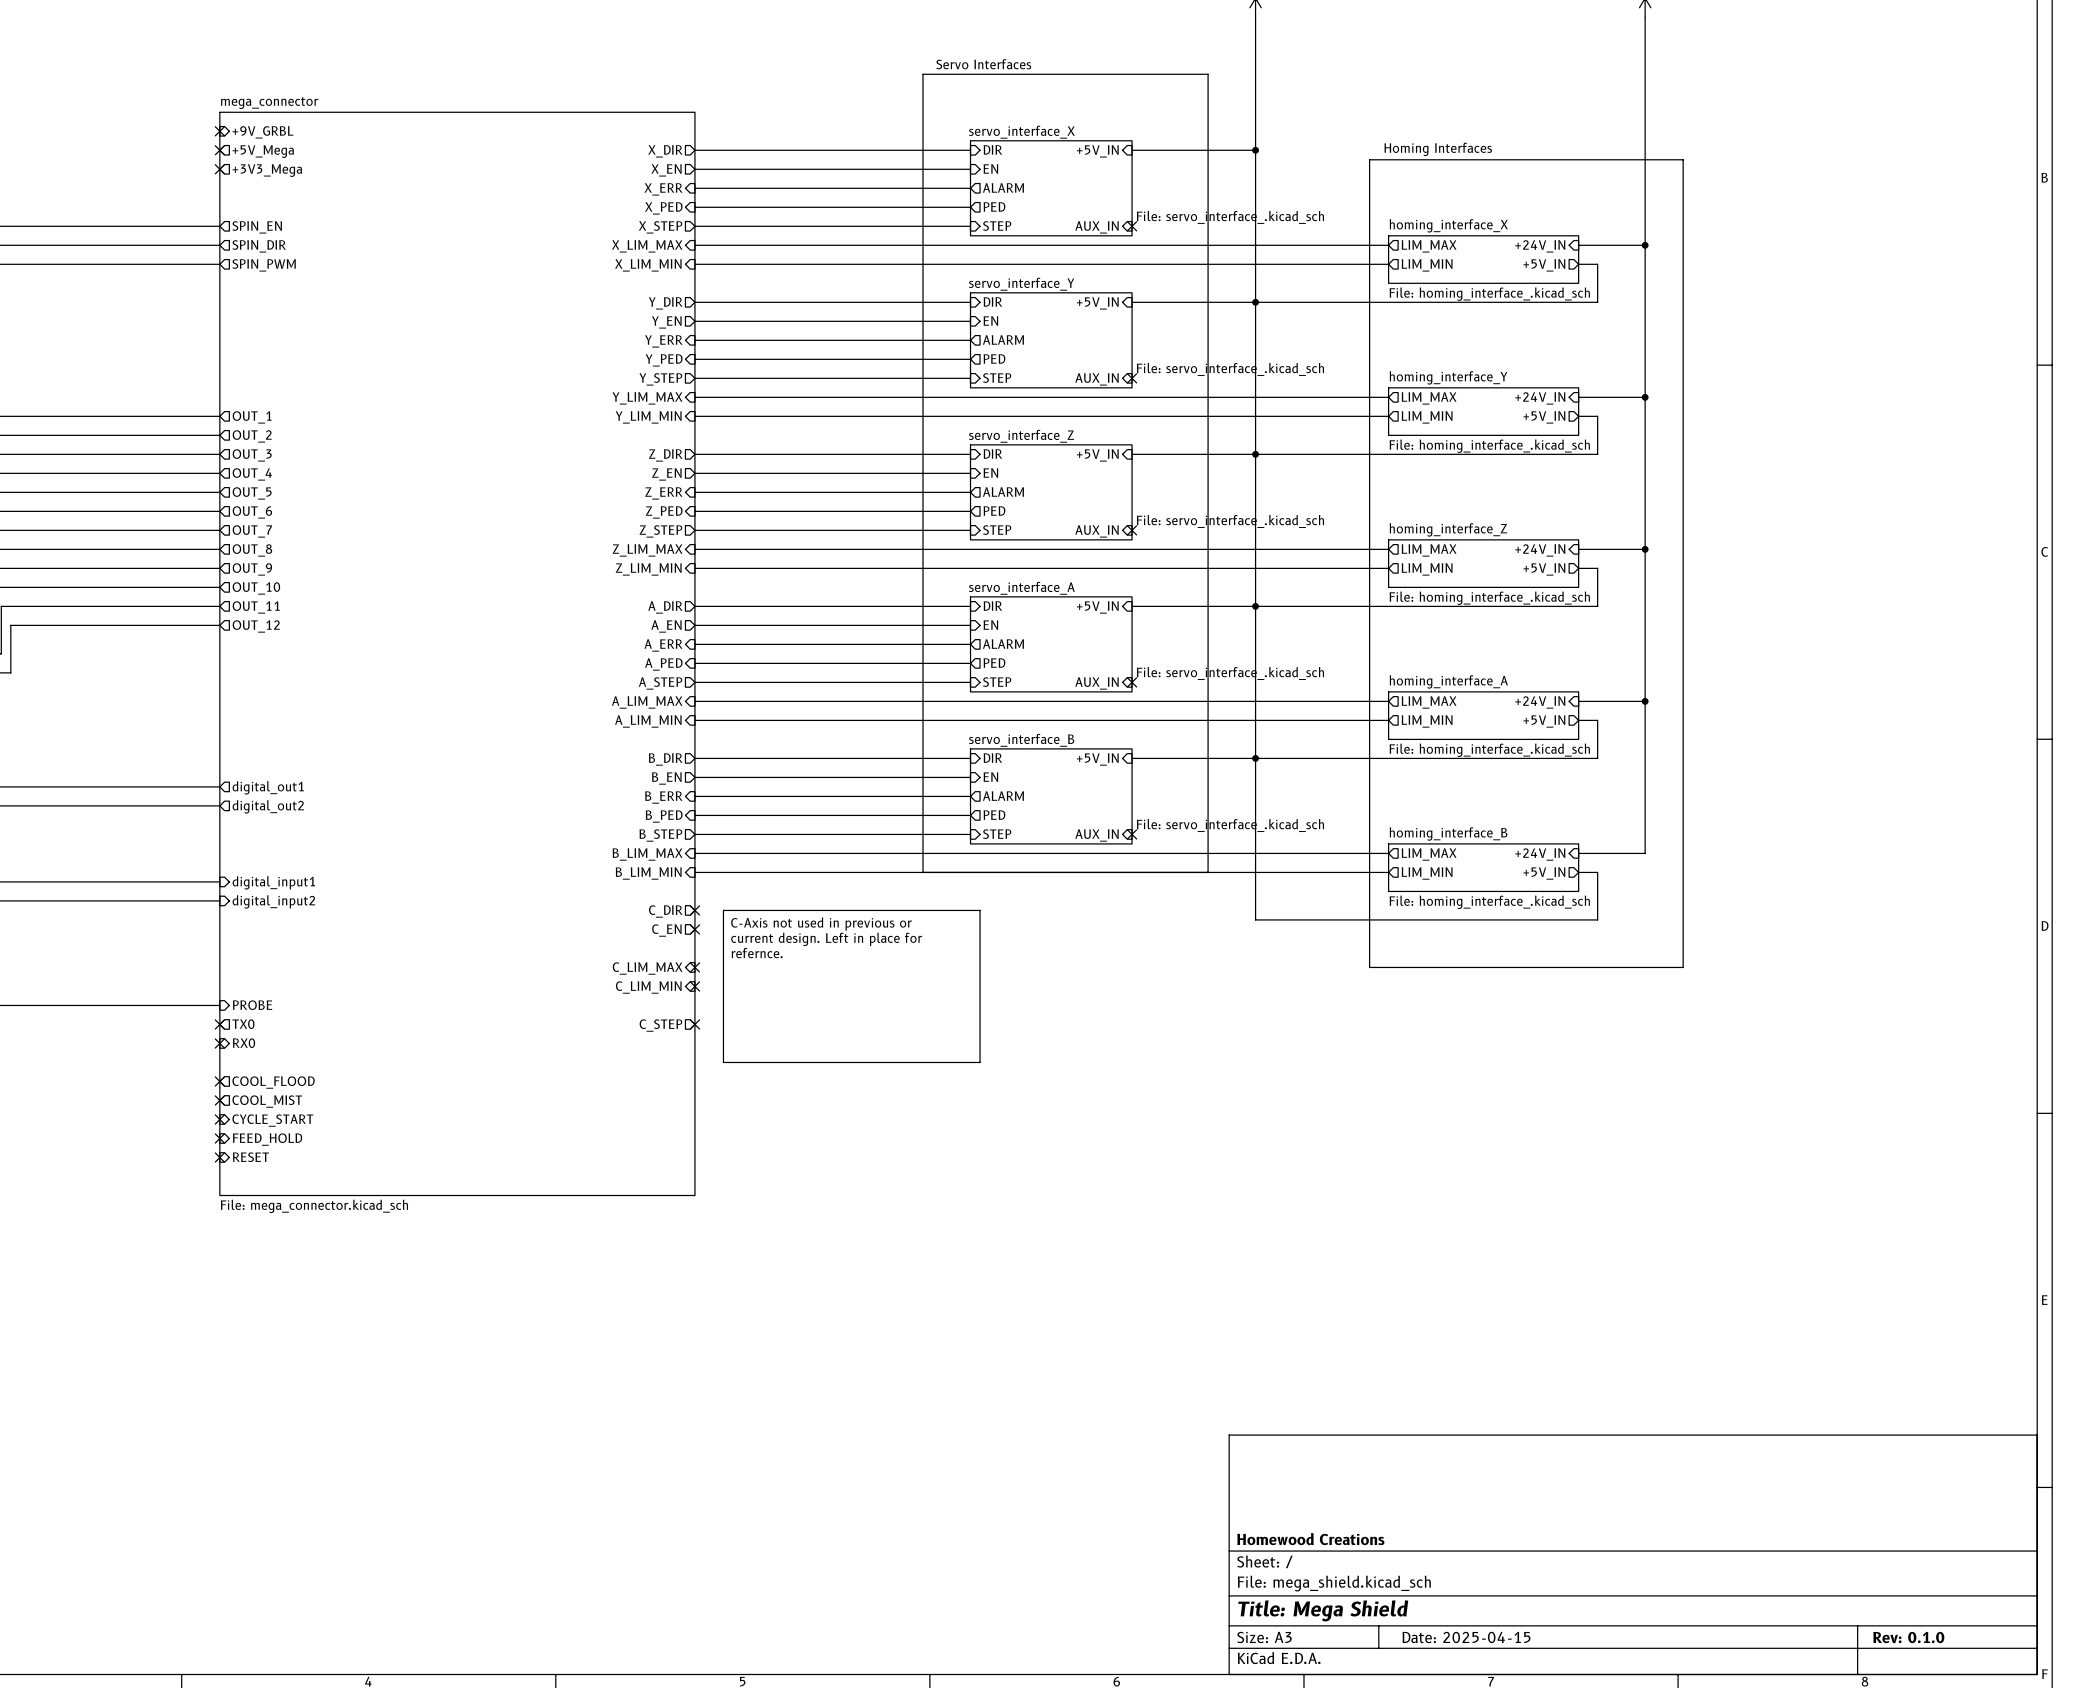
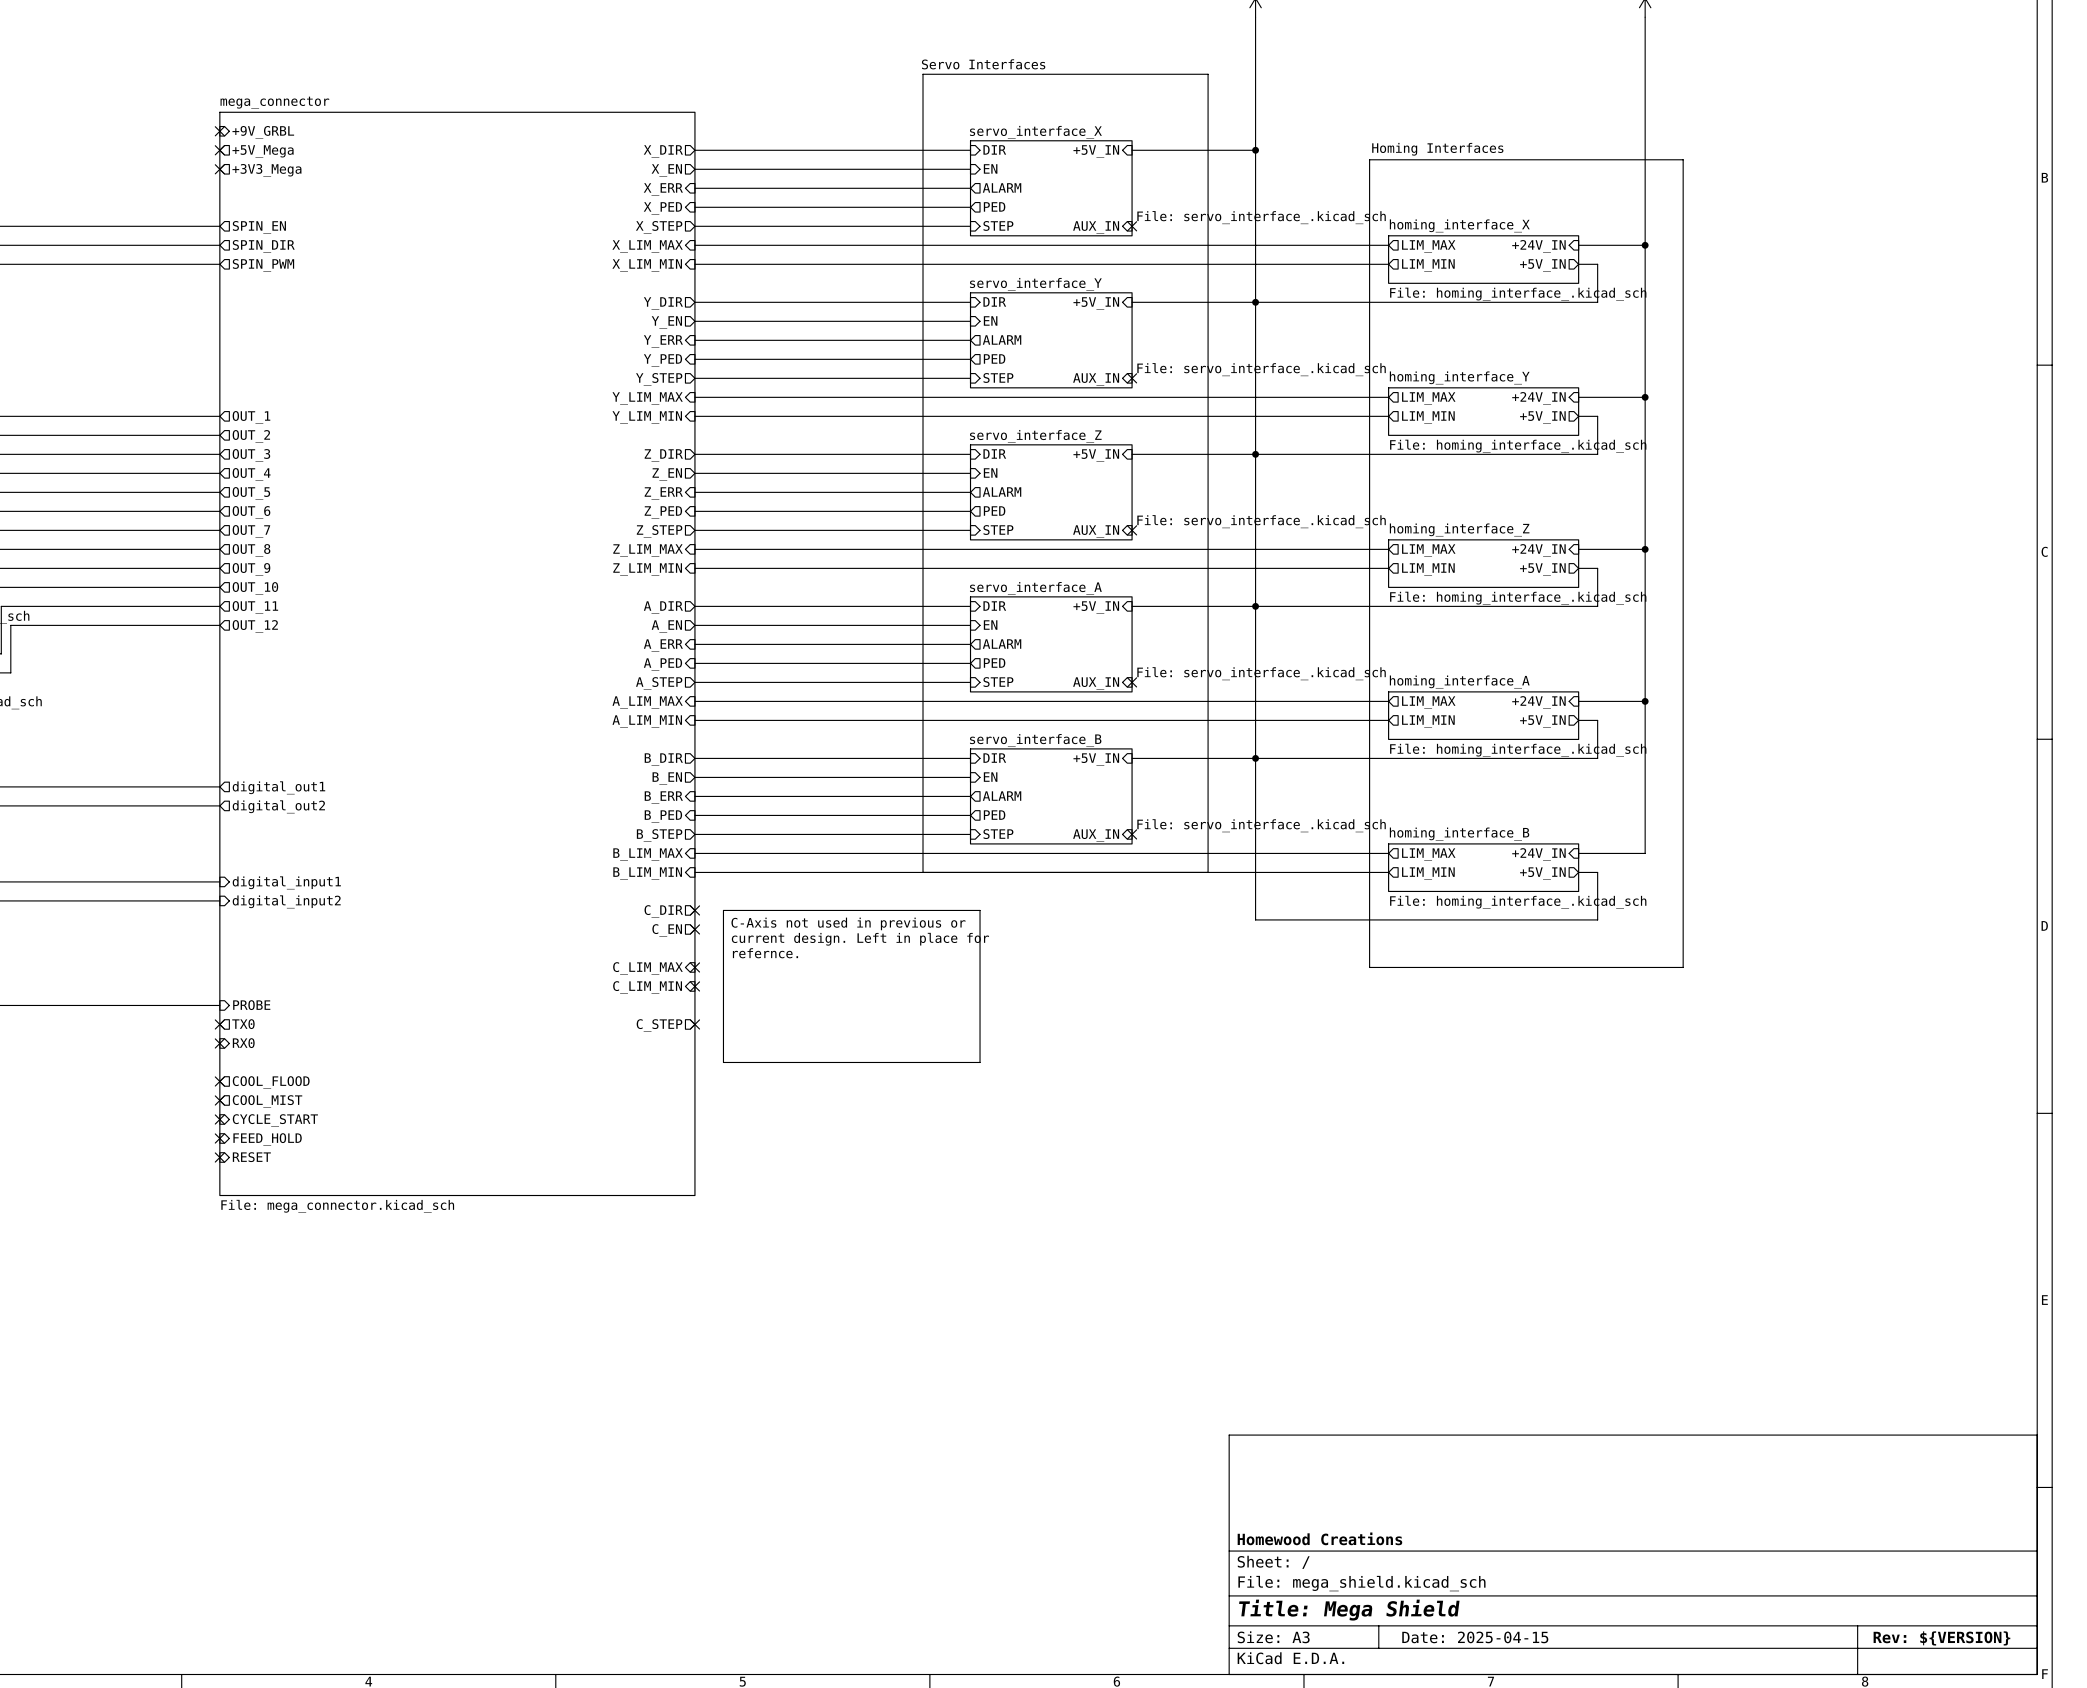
title block: Rev: 0.1.0 (1908, 1637) -> Rev: ${VERSION} (1941, 1638)

